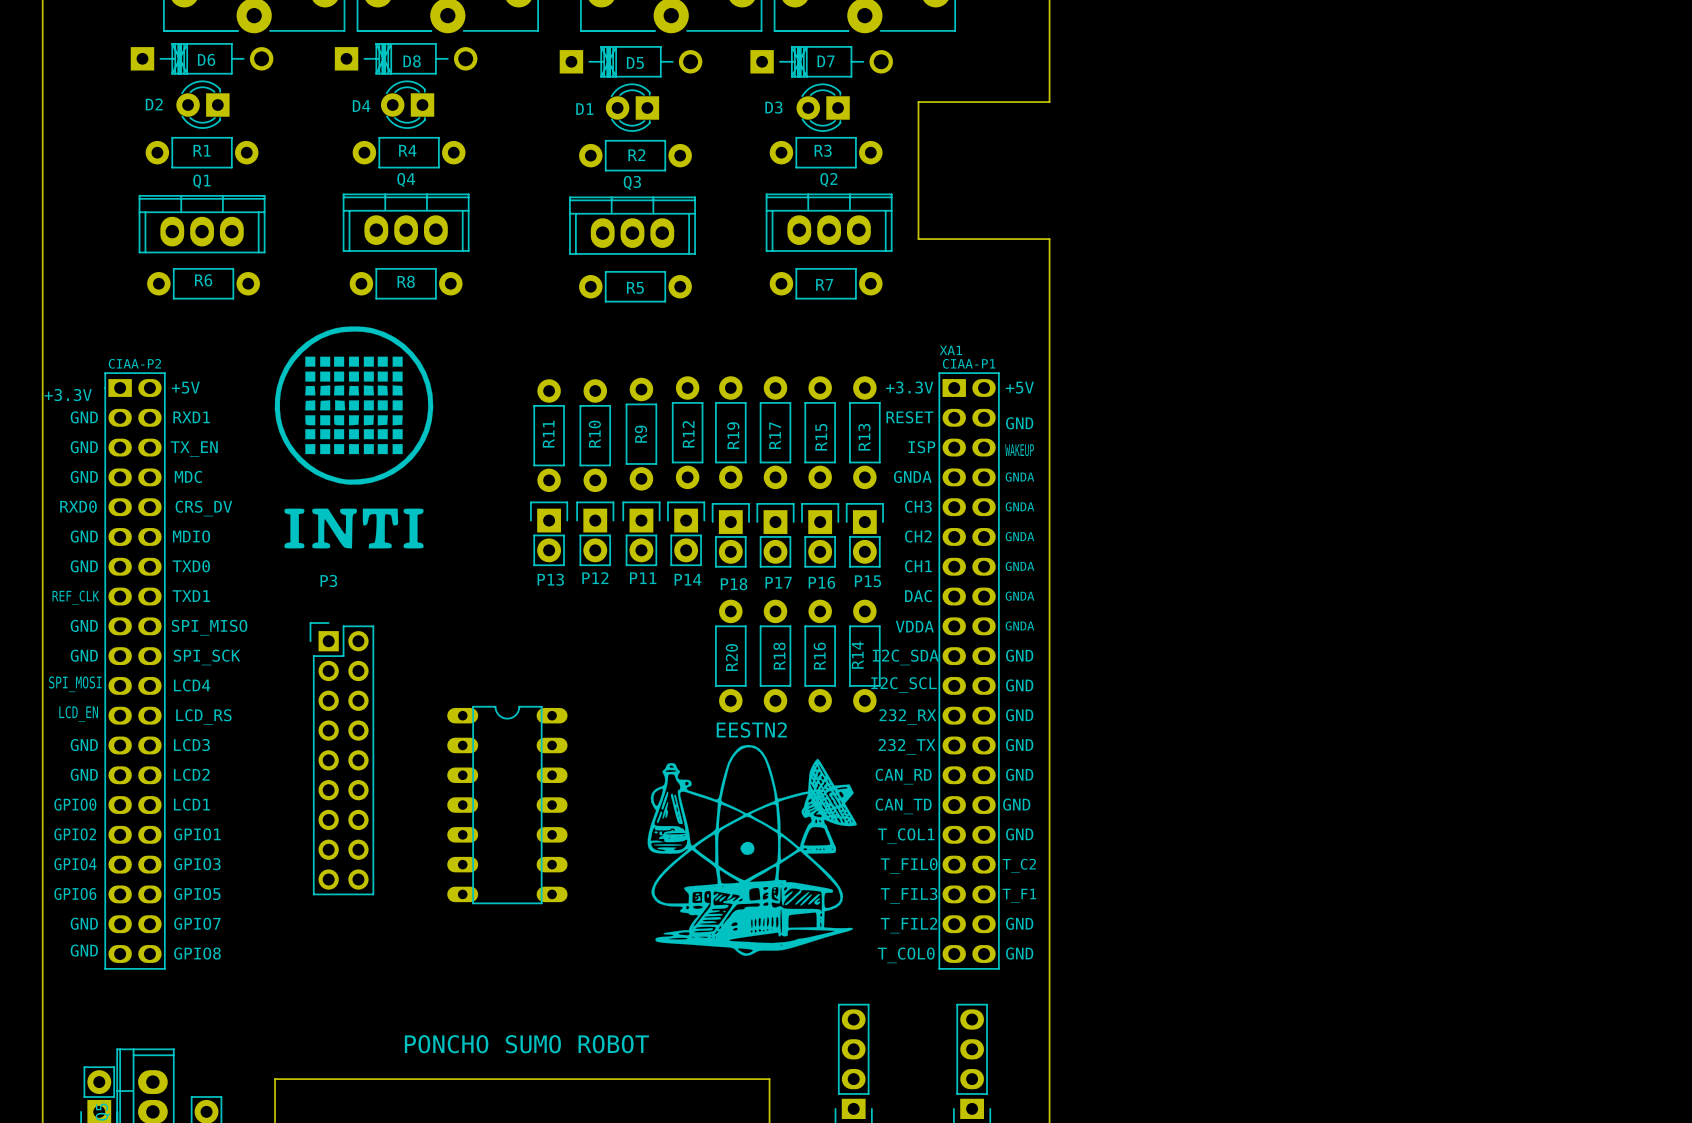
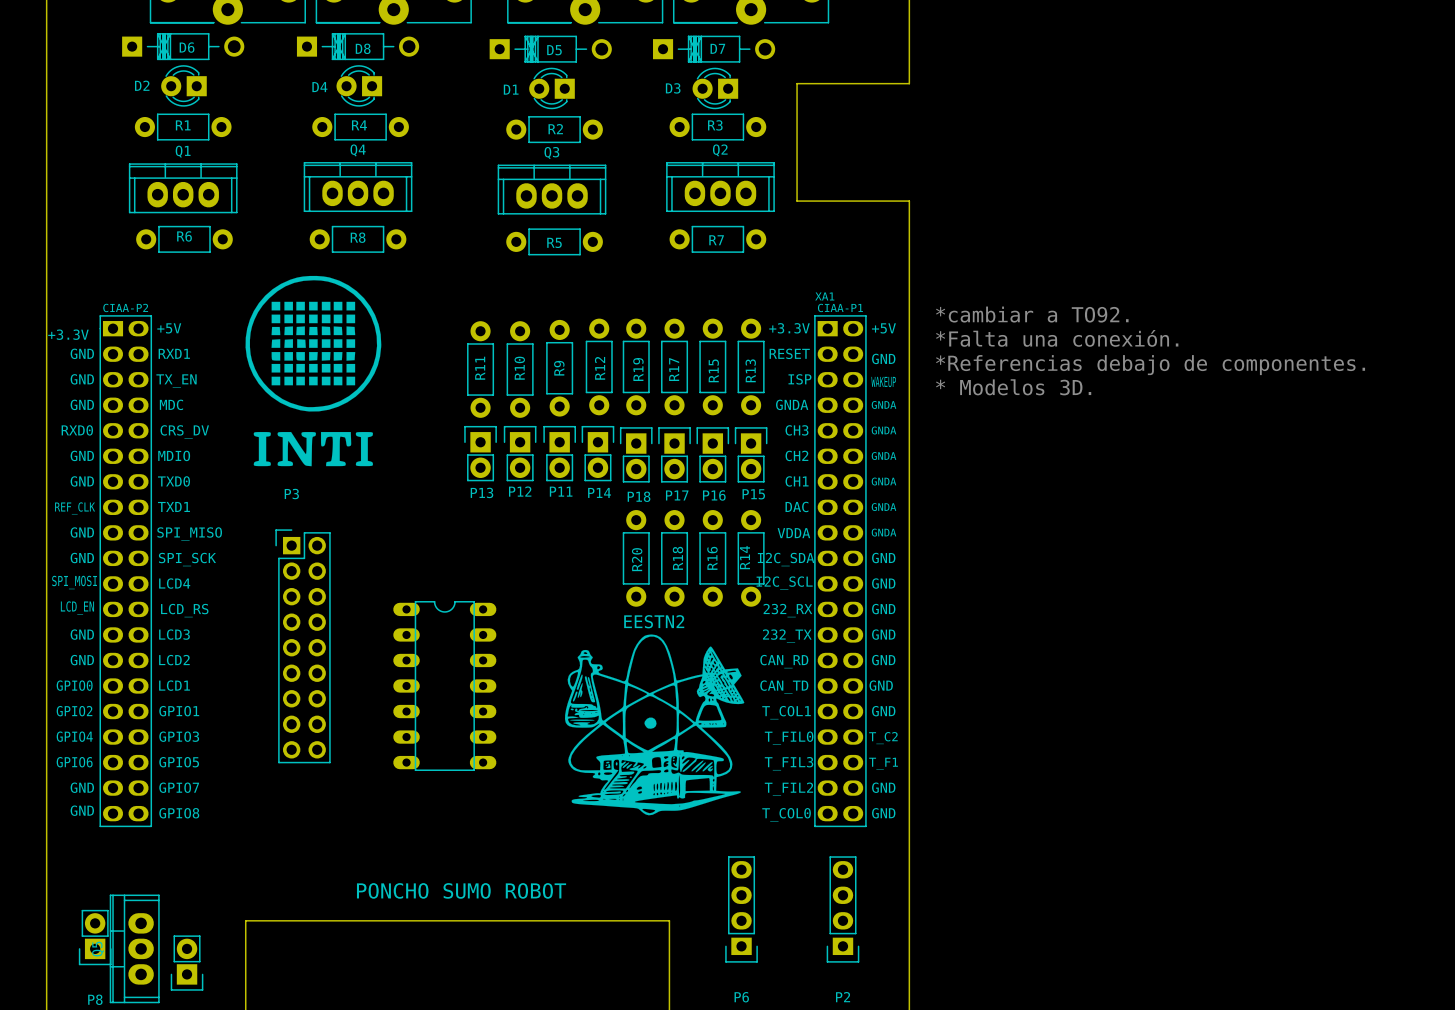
text: none -> *cambiar a TO92. (1032, 314)
text: none -> *Falta una conexión. (1057, 338)
text: none -> *Referencias debajo de componentes. (1150, 365)
text: none -> * Modelos 3D. (1013, 387)

